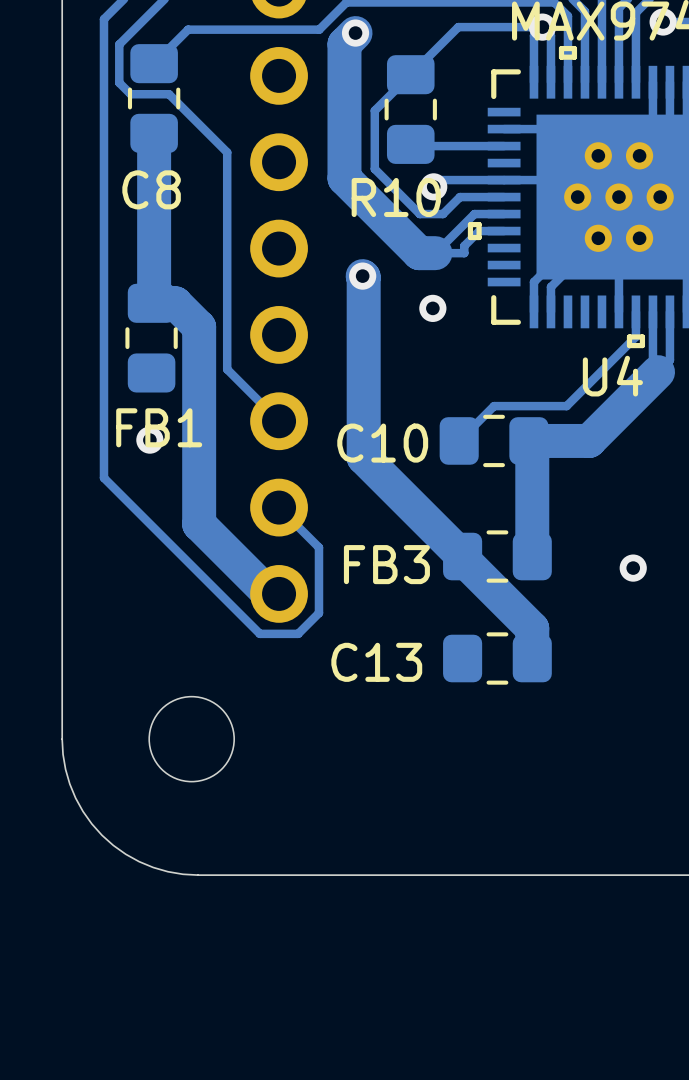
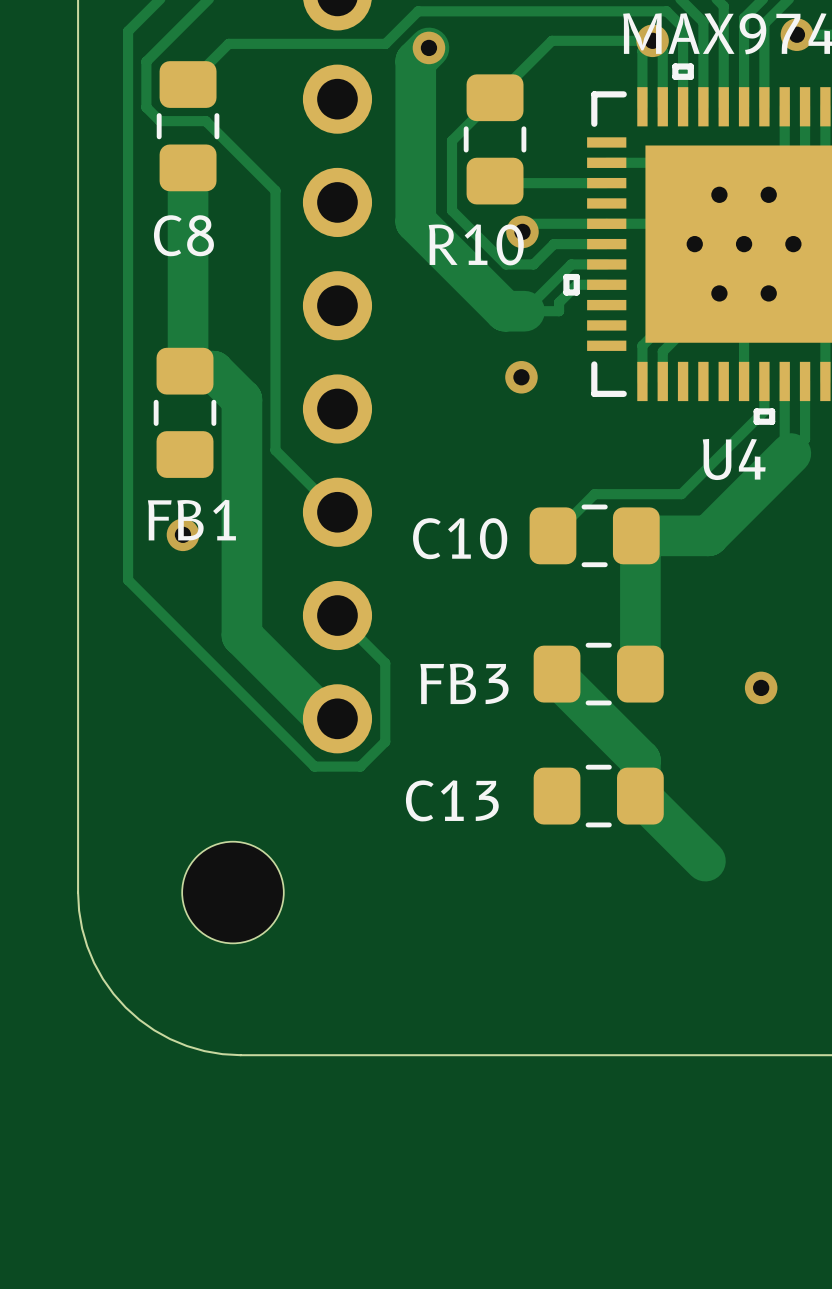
track: (362, 276) (363, 457) (462, 556) -> none
via: (362, 276) -> none
track: none -> (640, 796) (705, 861)

